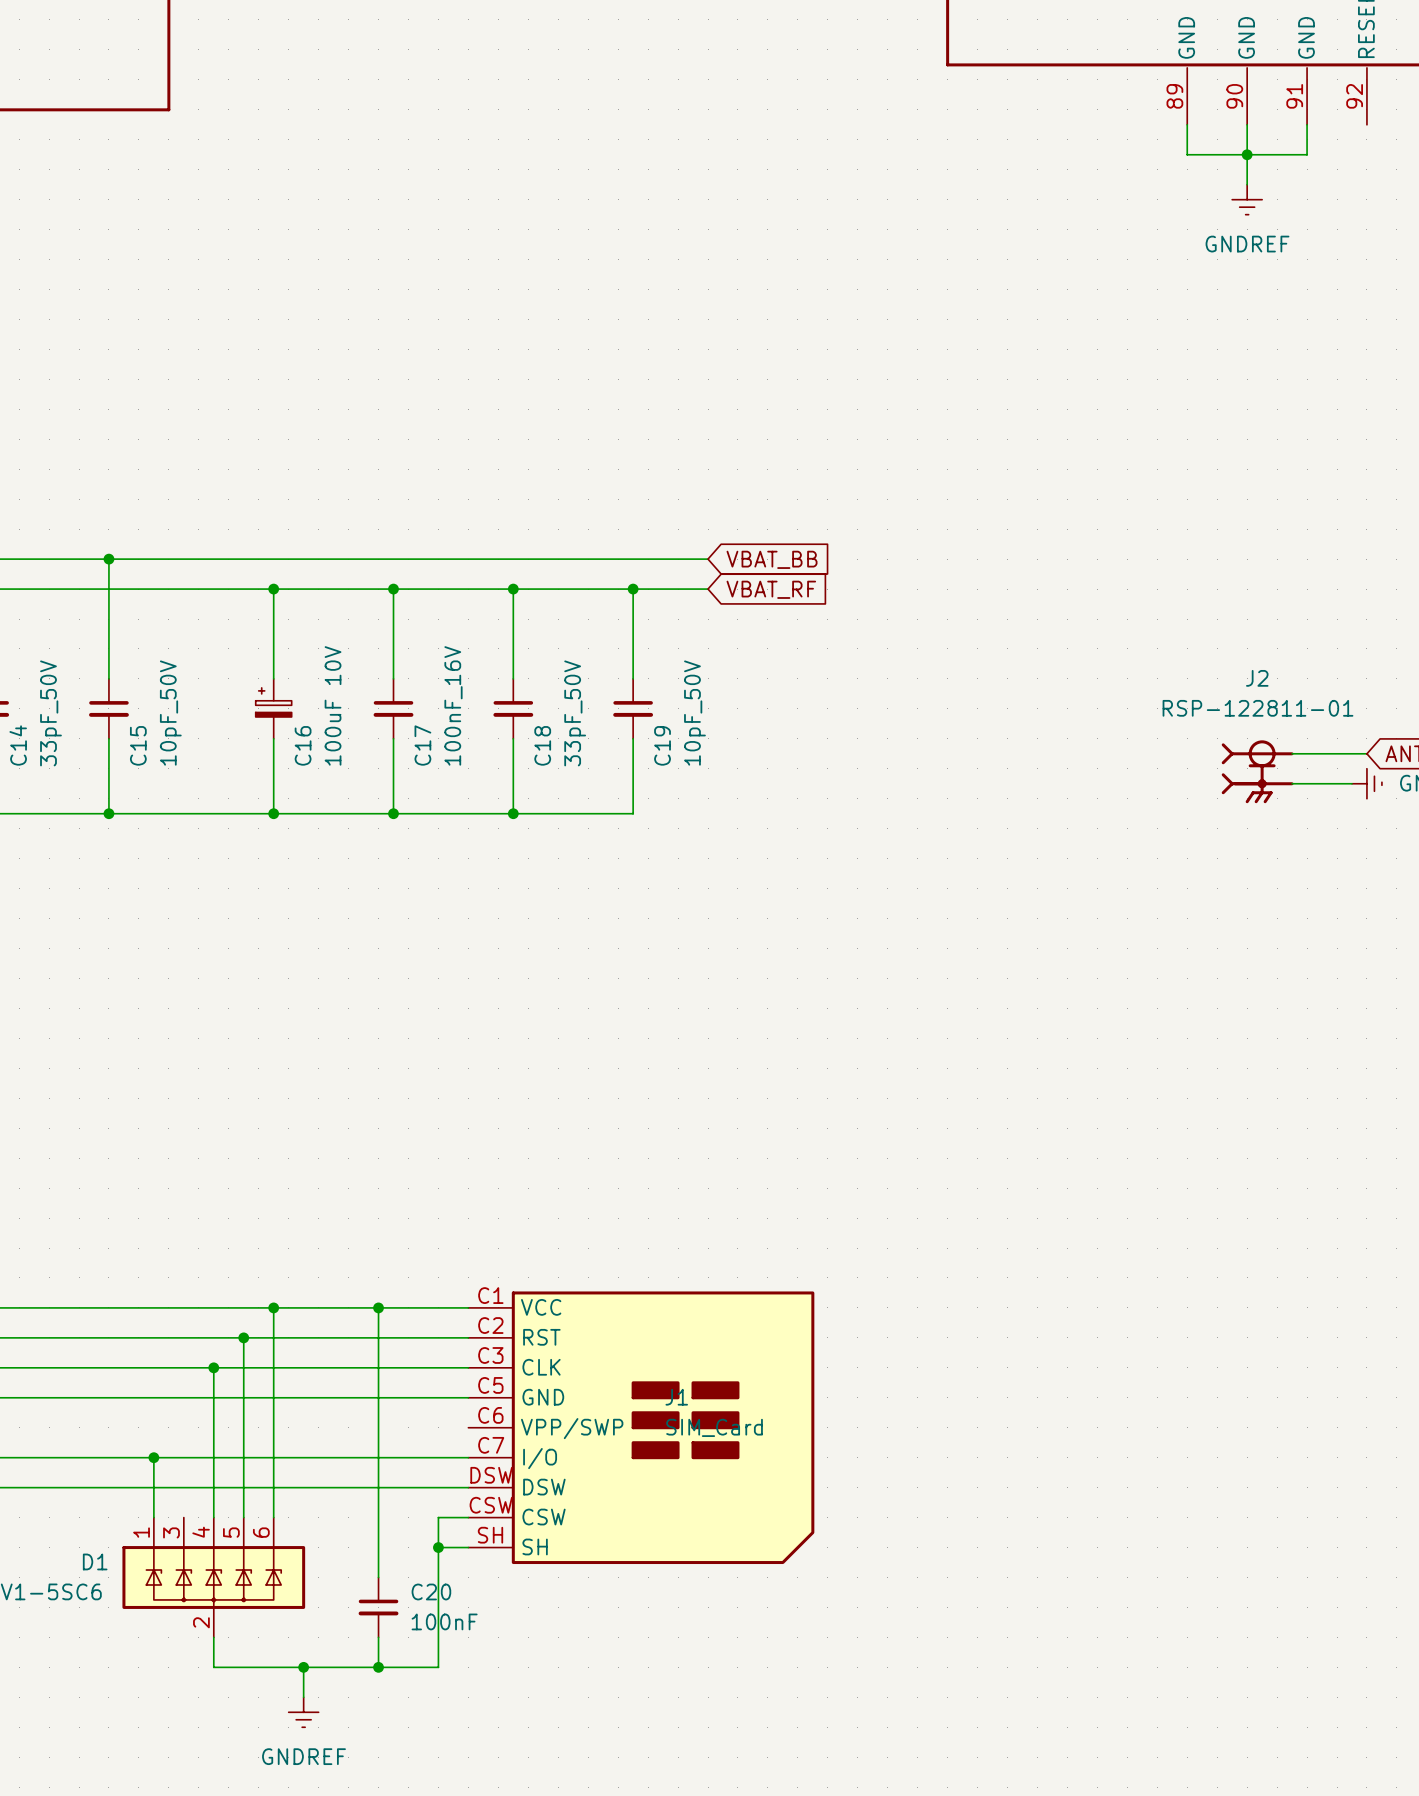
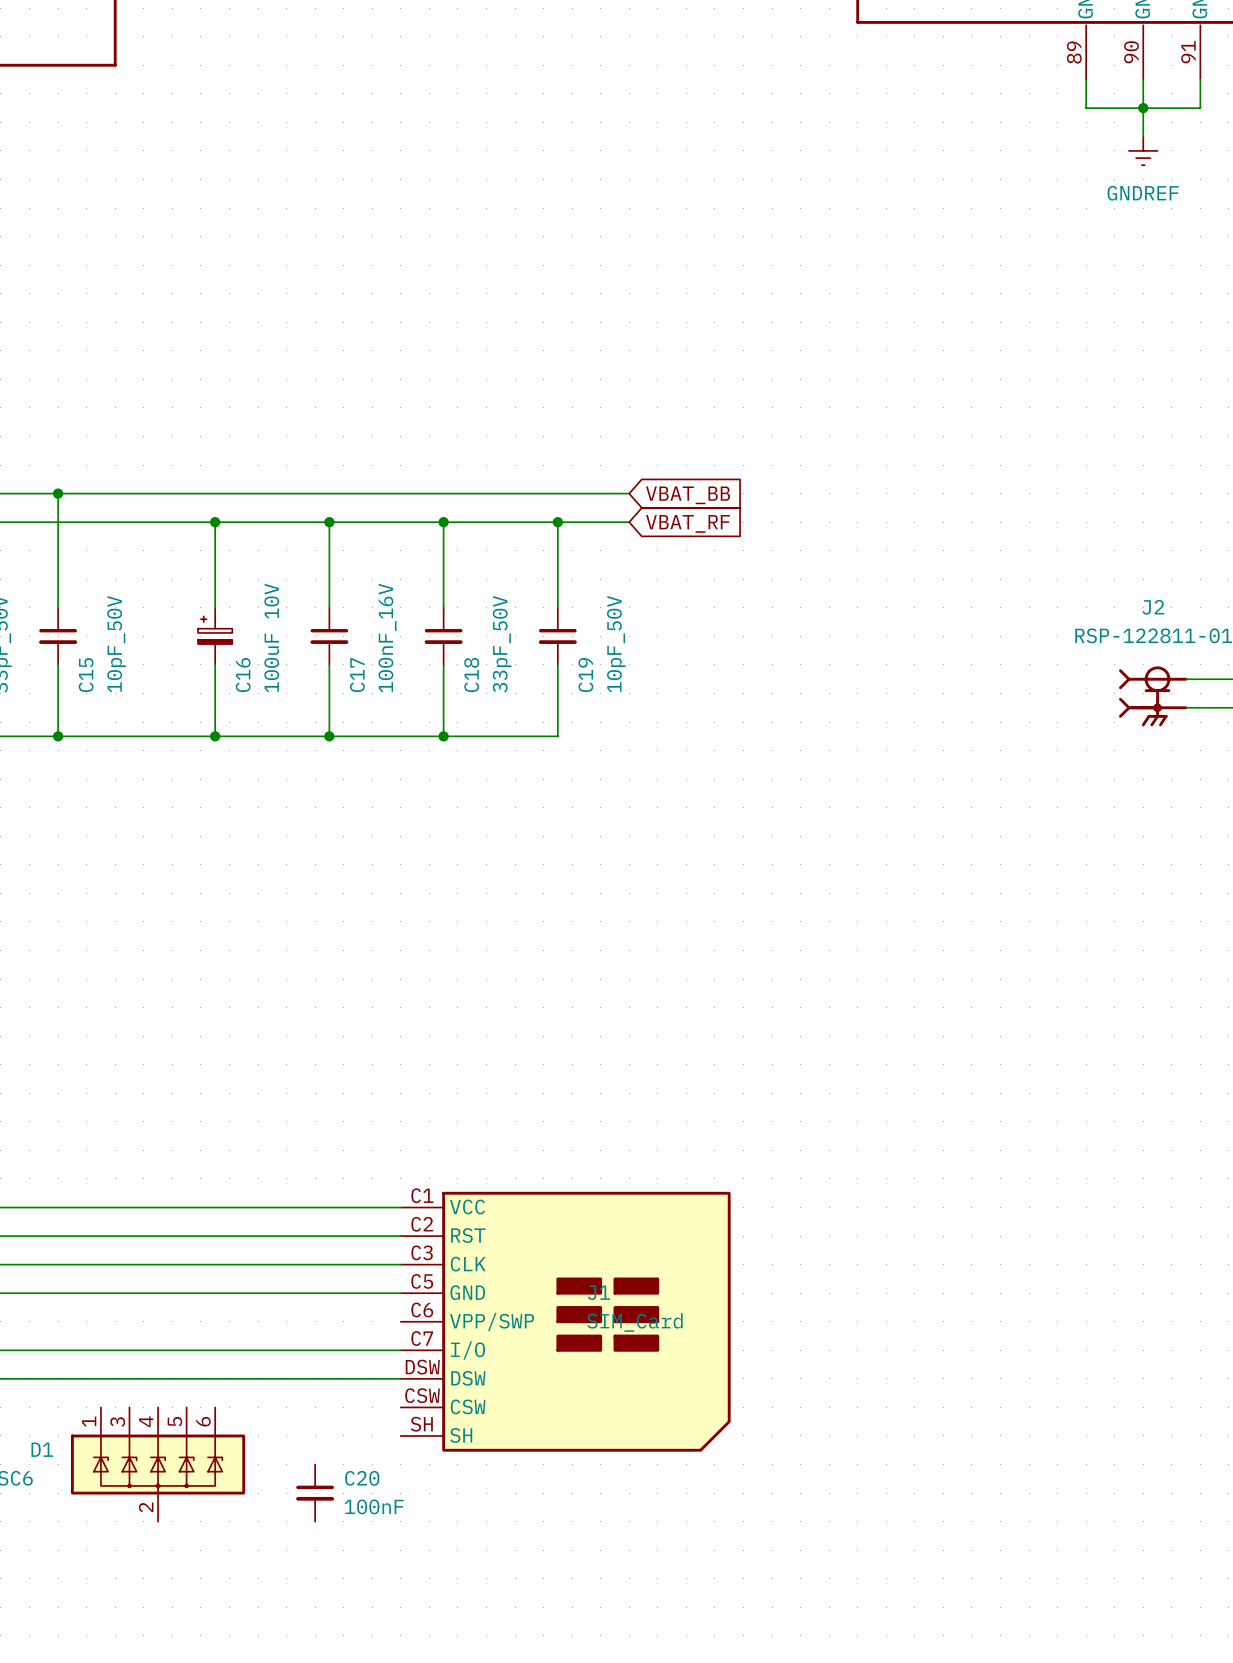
wire: (273, 1307) (273, 1517) -> none
junction: (273, 1307) -> none
wire: (378, 1307) (378, 1577) -> none
junction: (378, 1307) -> none
wire: (243, 1337) (243, 1517) -> none
junction: (243, 1337) -> none
wire: (213, 1367) (213, 1517) -> none
junction: (213, 1367) -> none
wire: (153, 1457) (153, 1517) -> none
junction: (153, 1457) -> none
wire: (468, 1517) (438, 1517) (438, 1667) (213, 1667) (213, 1637) -> none
wire: (438, 1547) (468, 1547) -> none
junction: (438, 1547) -> none
wire: (378, 1637) (378, 1667) -> none
wire: (303, 1667) (303, 1697) -> none
junction: (303, 1667) -> none
junction: (378, 1667) -> none
power symbol: GNDREF (303, 1712) -> none

